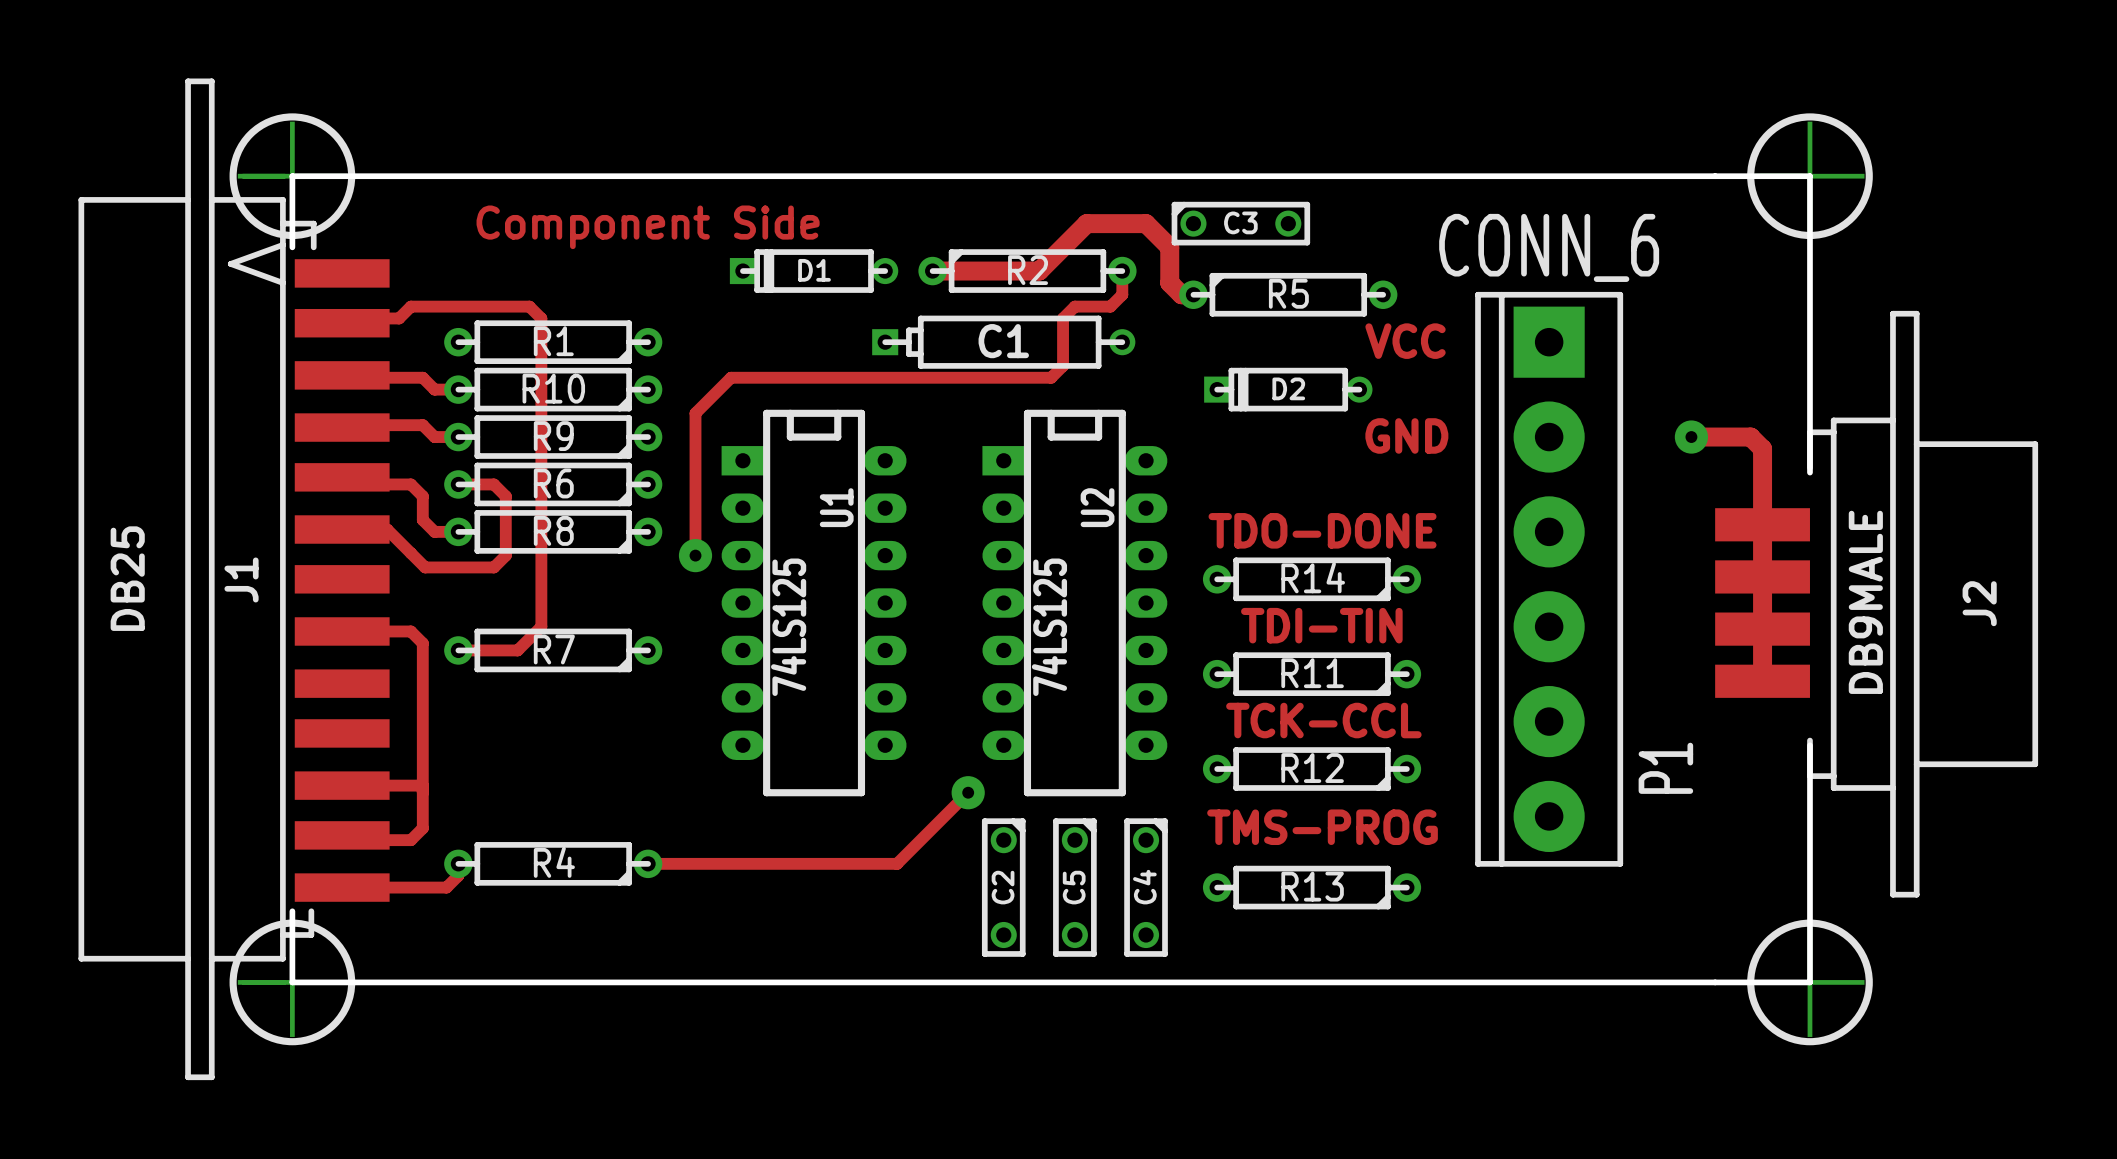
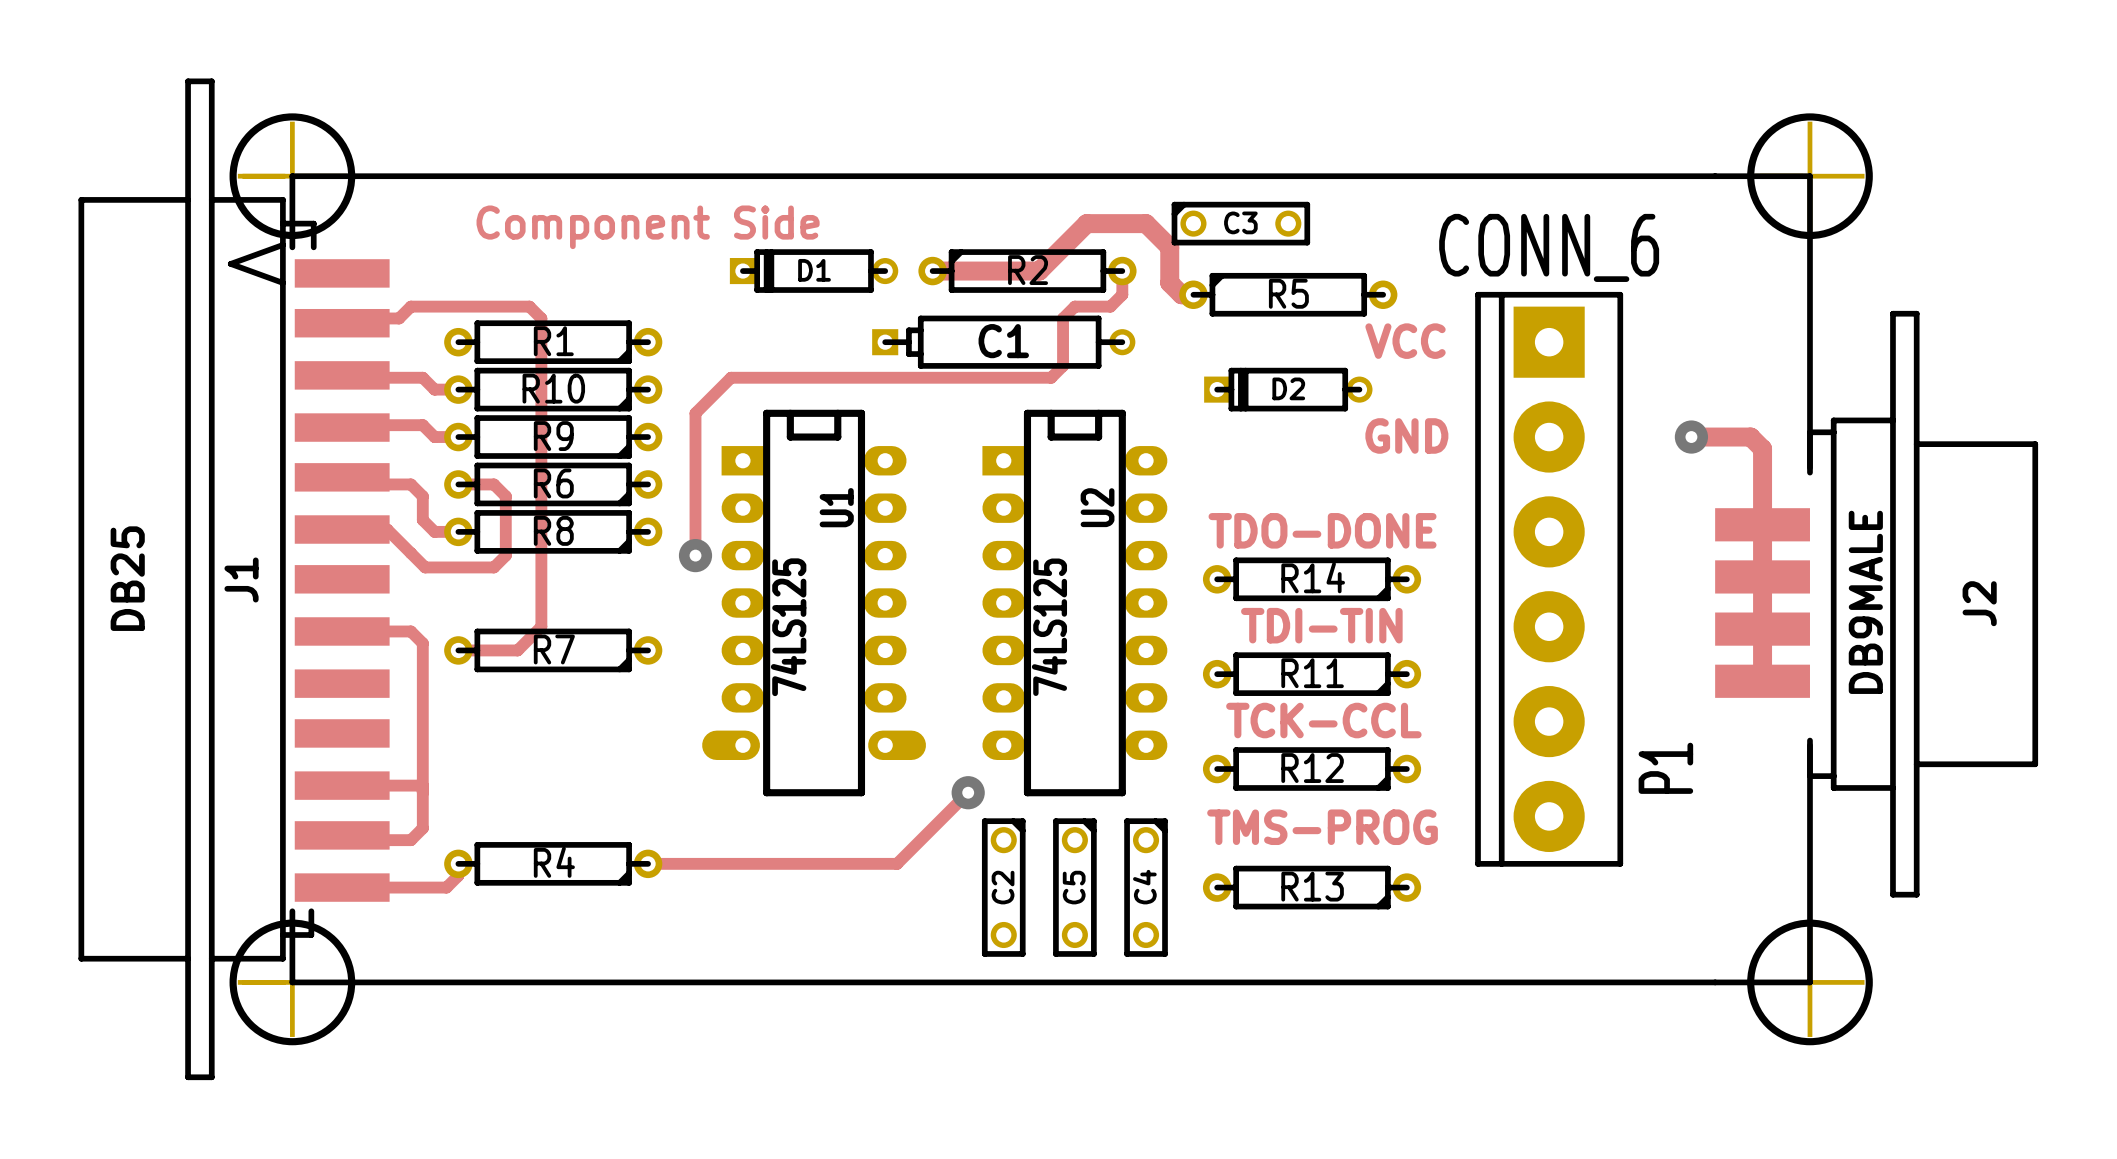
U1 footprint: [721, 409, 907, 797] -> [702, 409, 926, 797]

